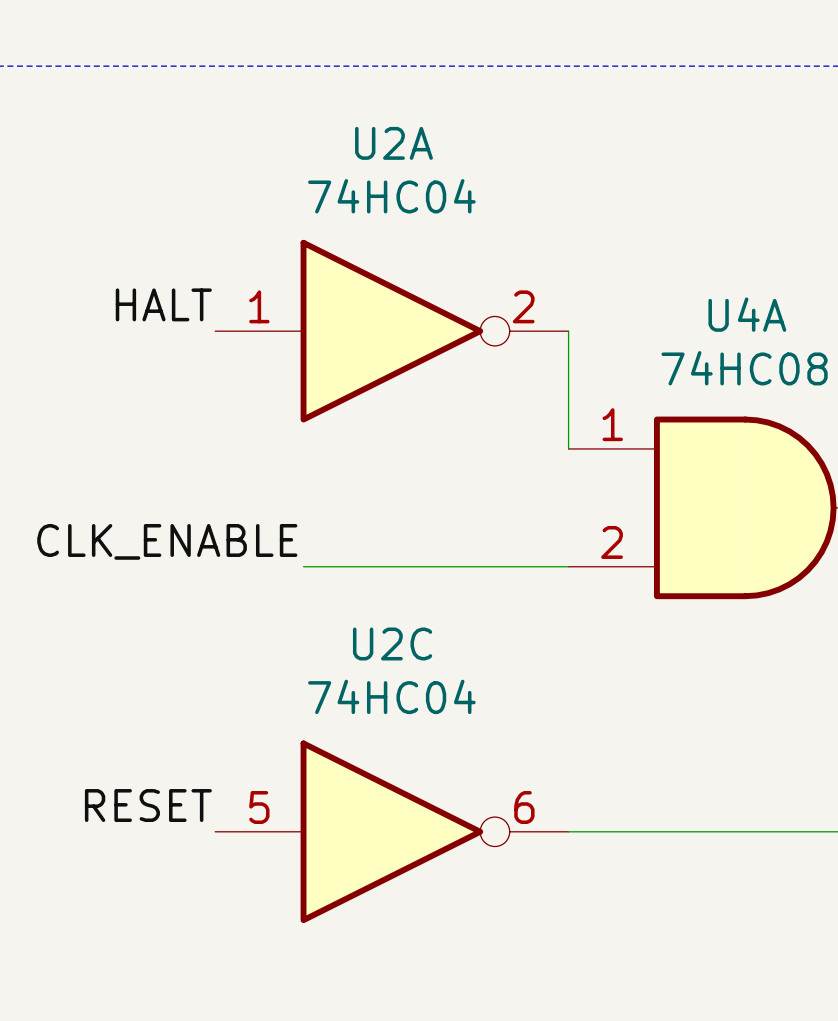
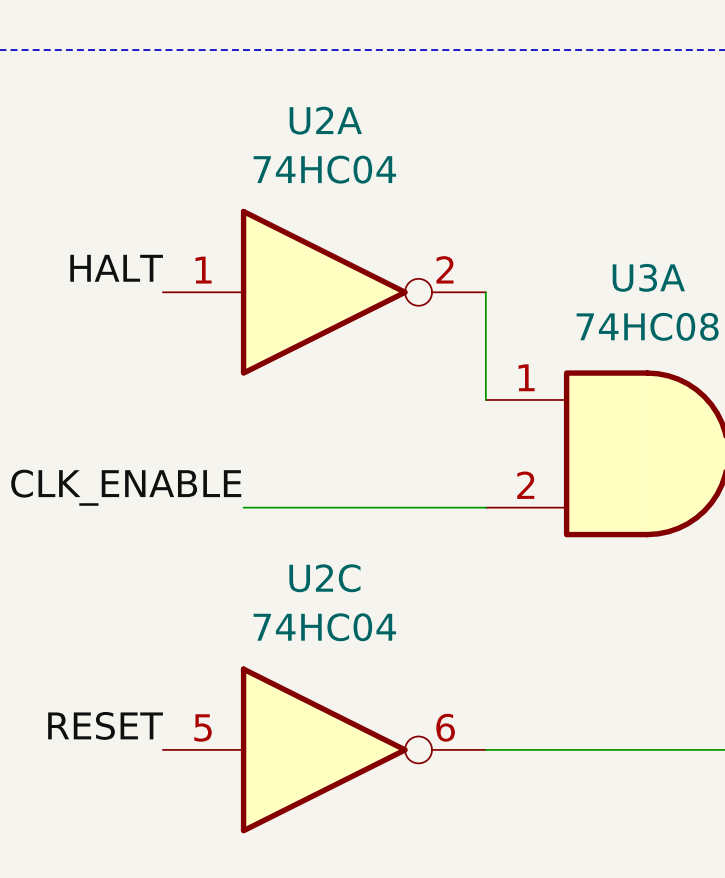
U4A name: U4A (747, 314) -> U3A (648, 277)

